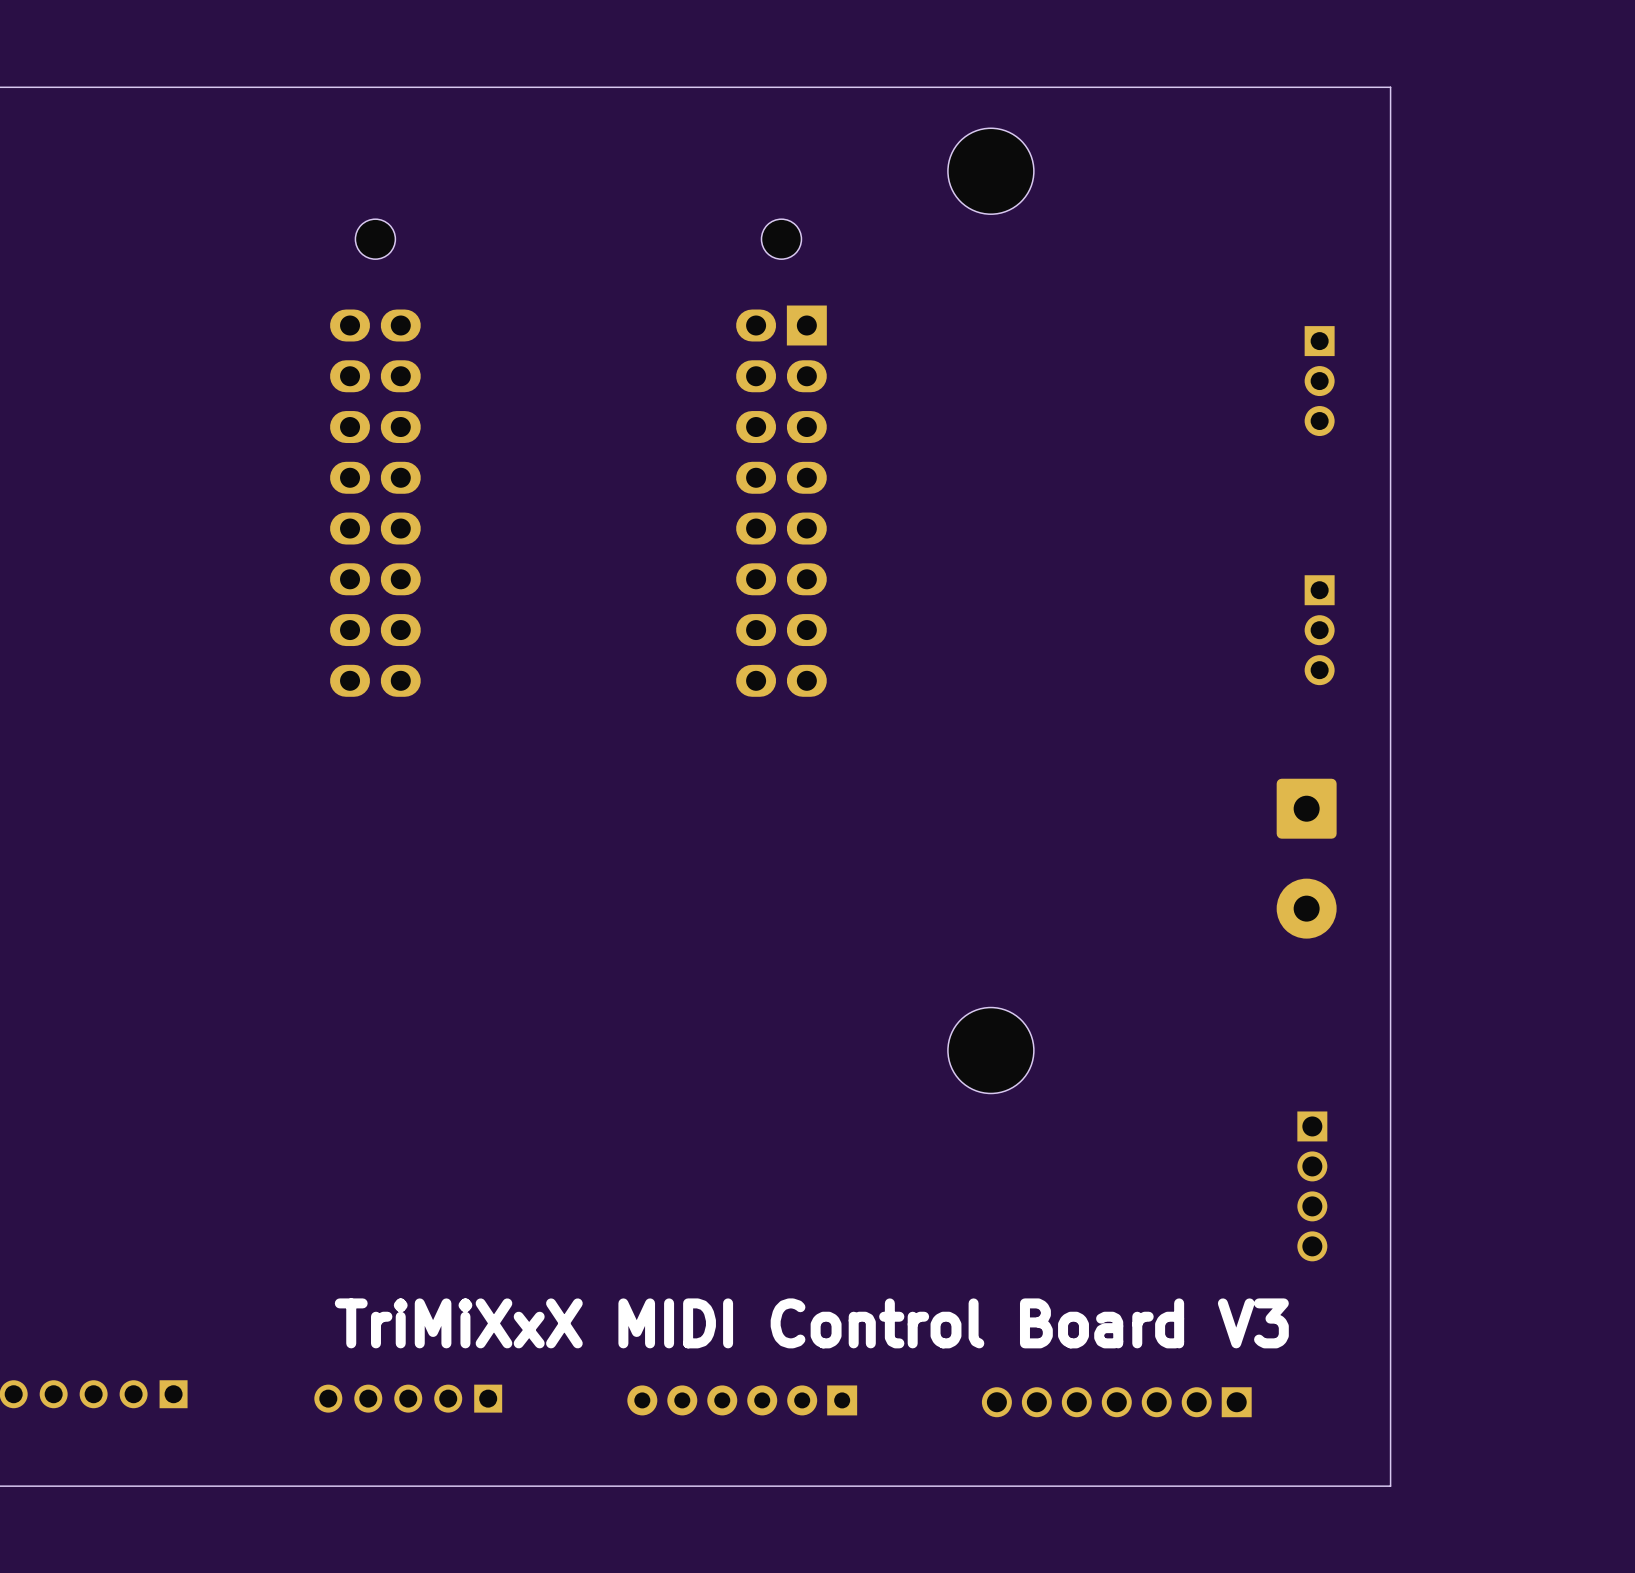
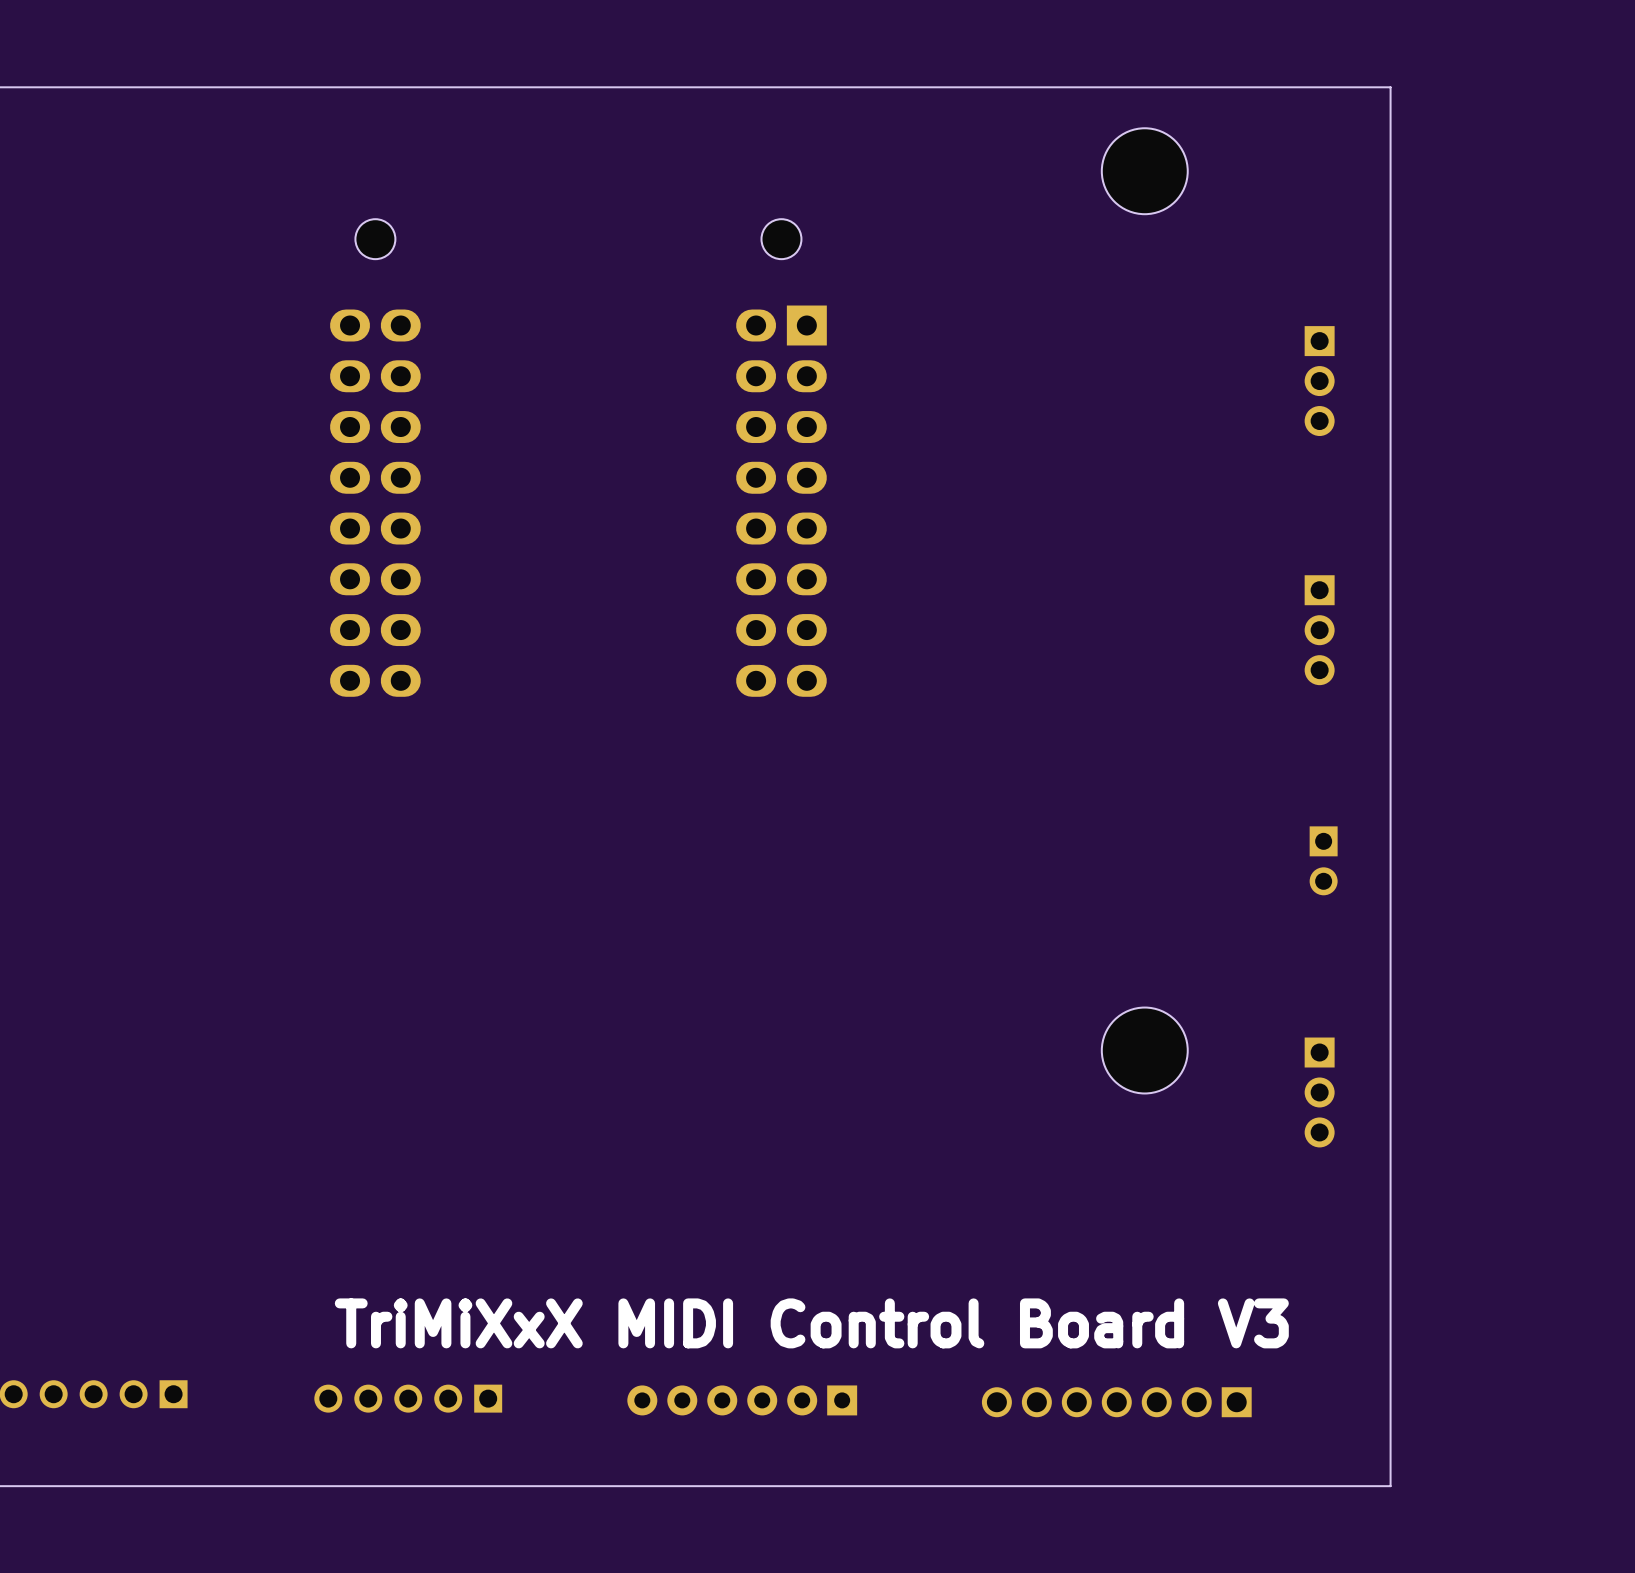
part position: (990, 171) -> (1144, 171)
part footprint: [1276, 778, 1337, 939] -> [1309, 826, 1338, 896]
part position: (990, 1050) -> (1144, 1050)
part: none -> (1319, 1092)
part: (1312, 1186) -> none

